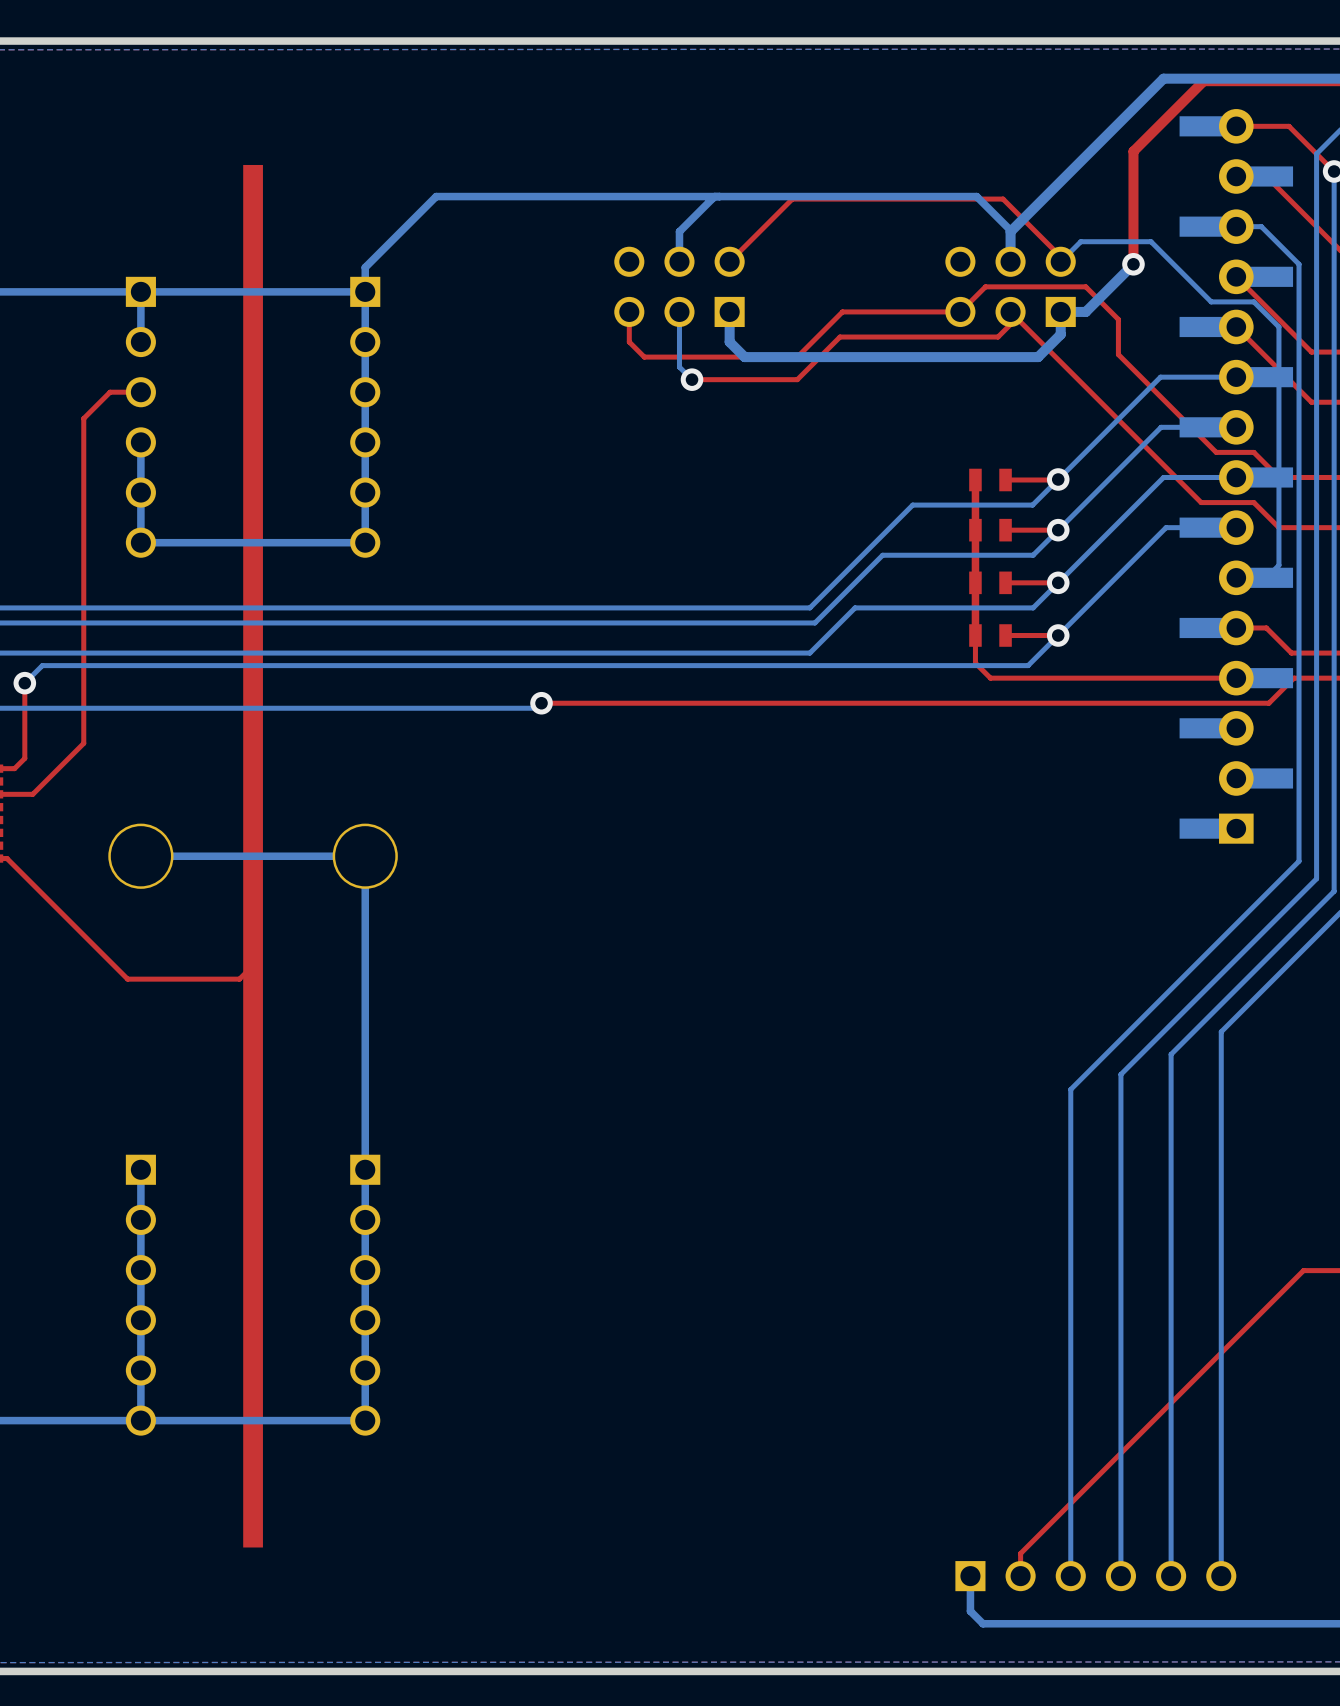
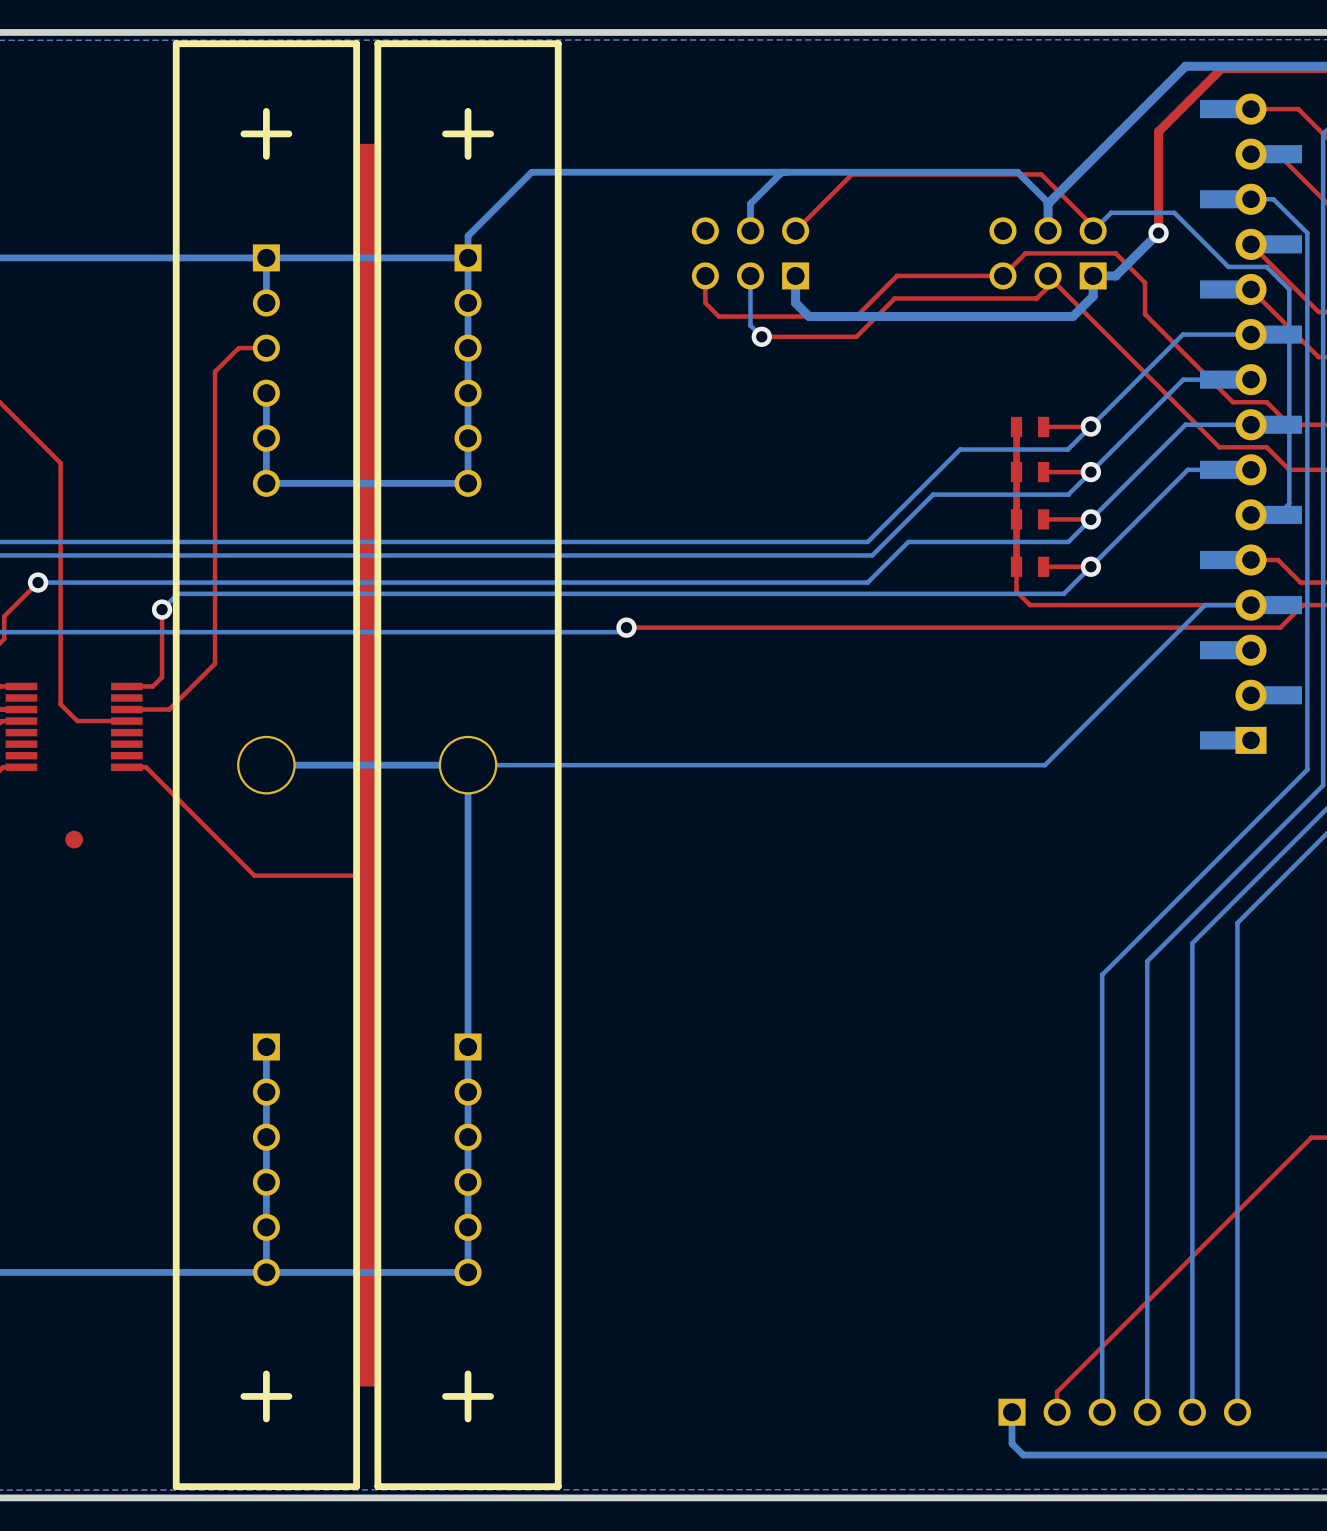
drawing: none -> [172, 40, 562, 1491]
bottom track: none -> (1251, 605) (1205, 605) (1044, 765) (468, 765)

